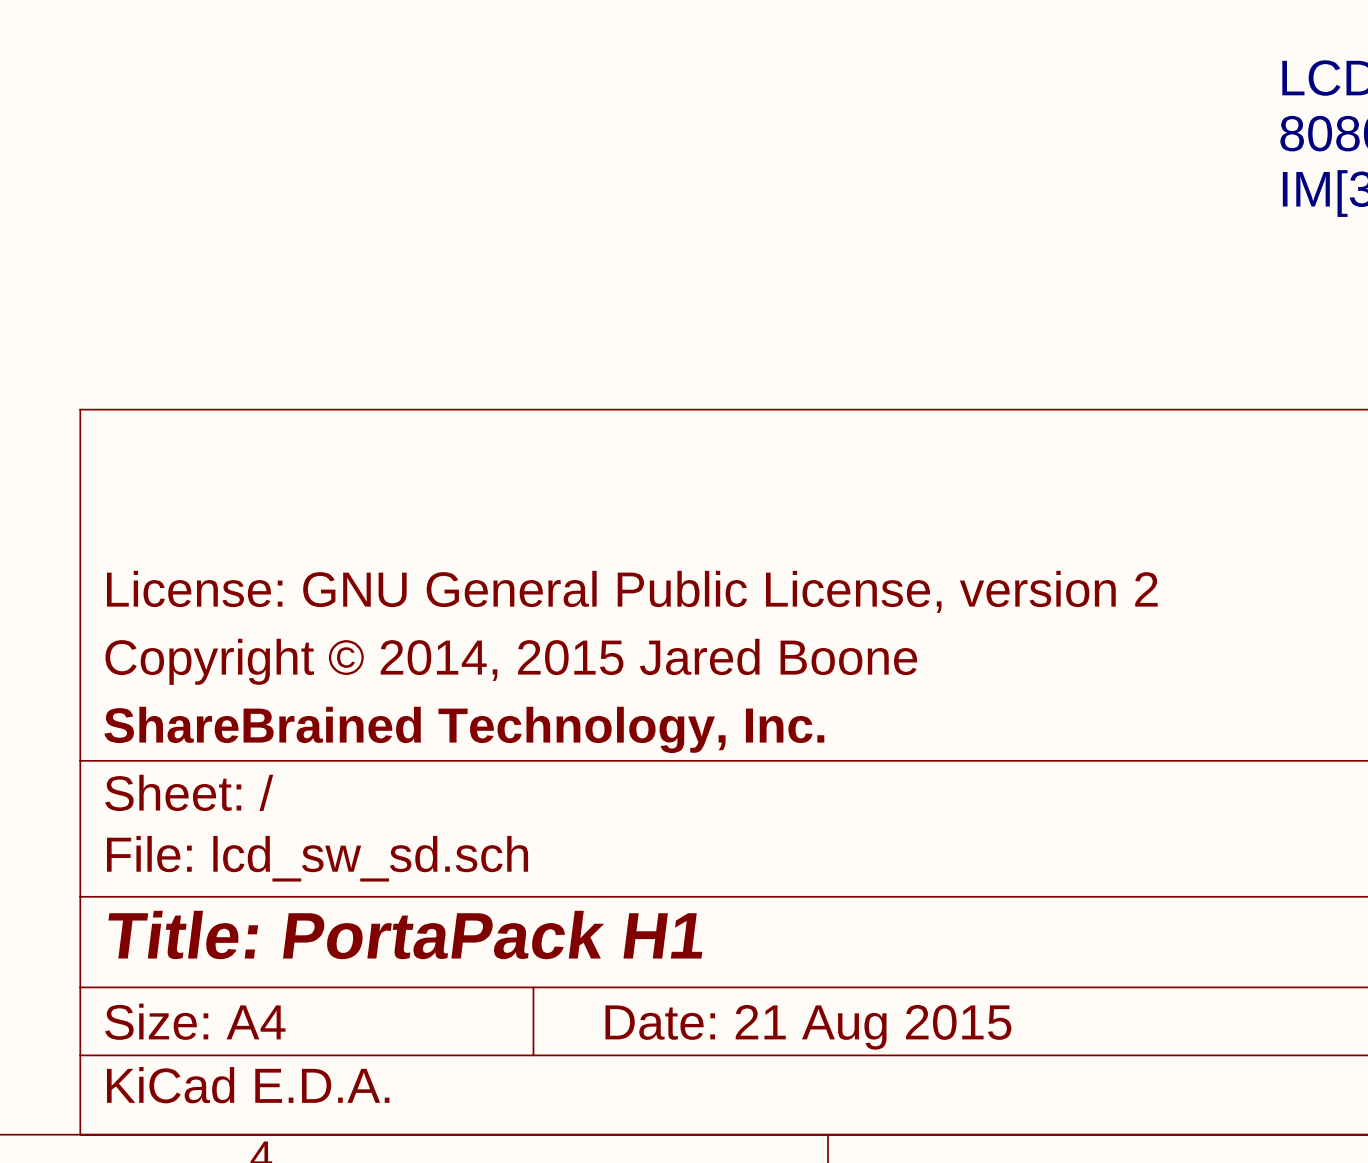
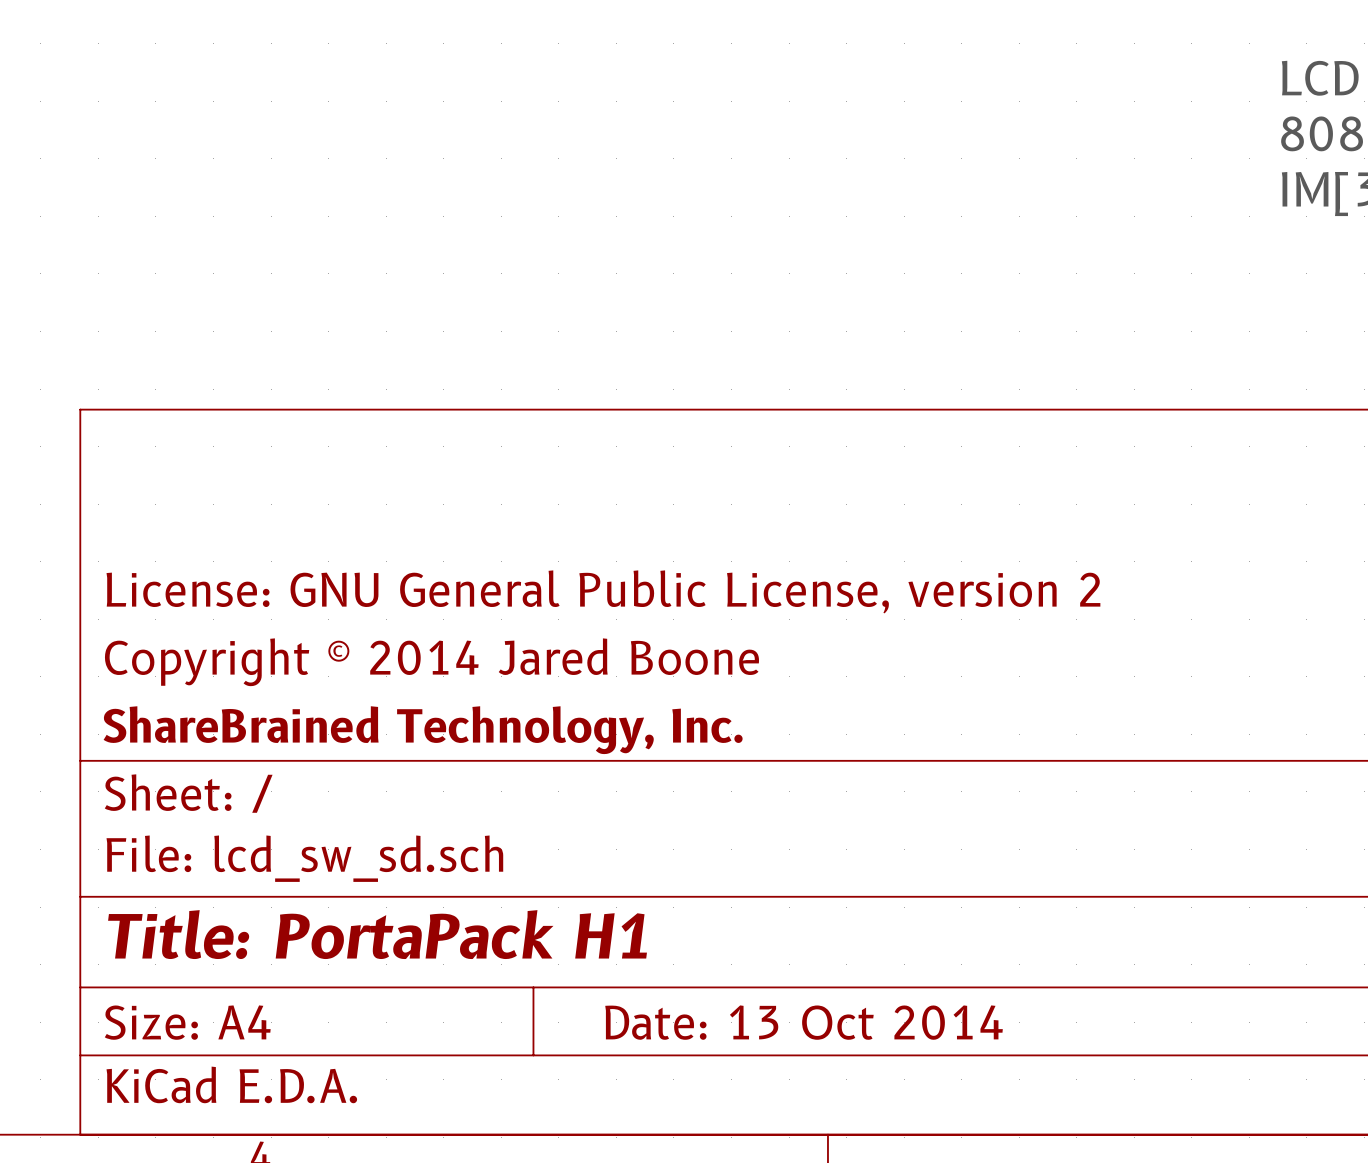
title block: Copyright © 2014, 2015 Jared Boone (511, 661) -> Copyright © 2014 Jared Boone (431, 662)
title block: Date: 21 Aug 2015 (808, 1027) -> Date: 13 Oct 2014 (804, 1022)

